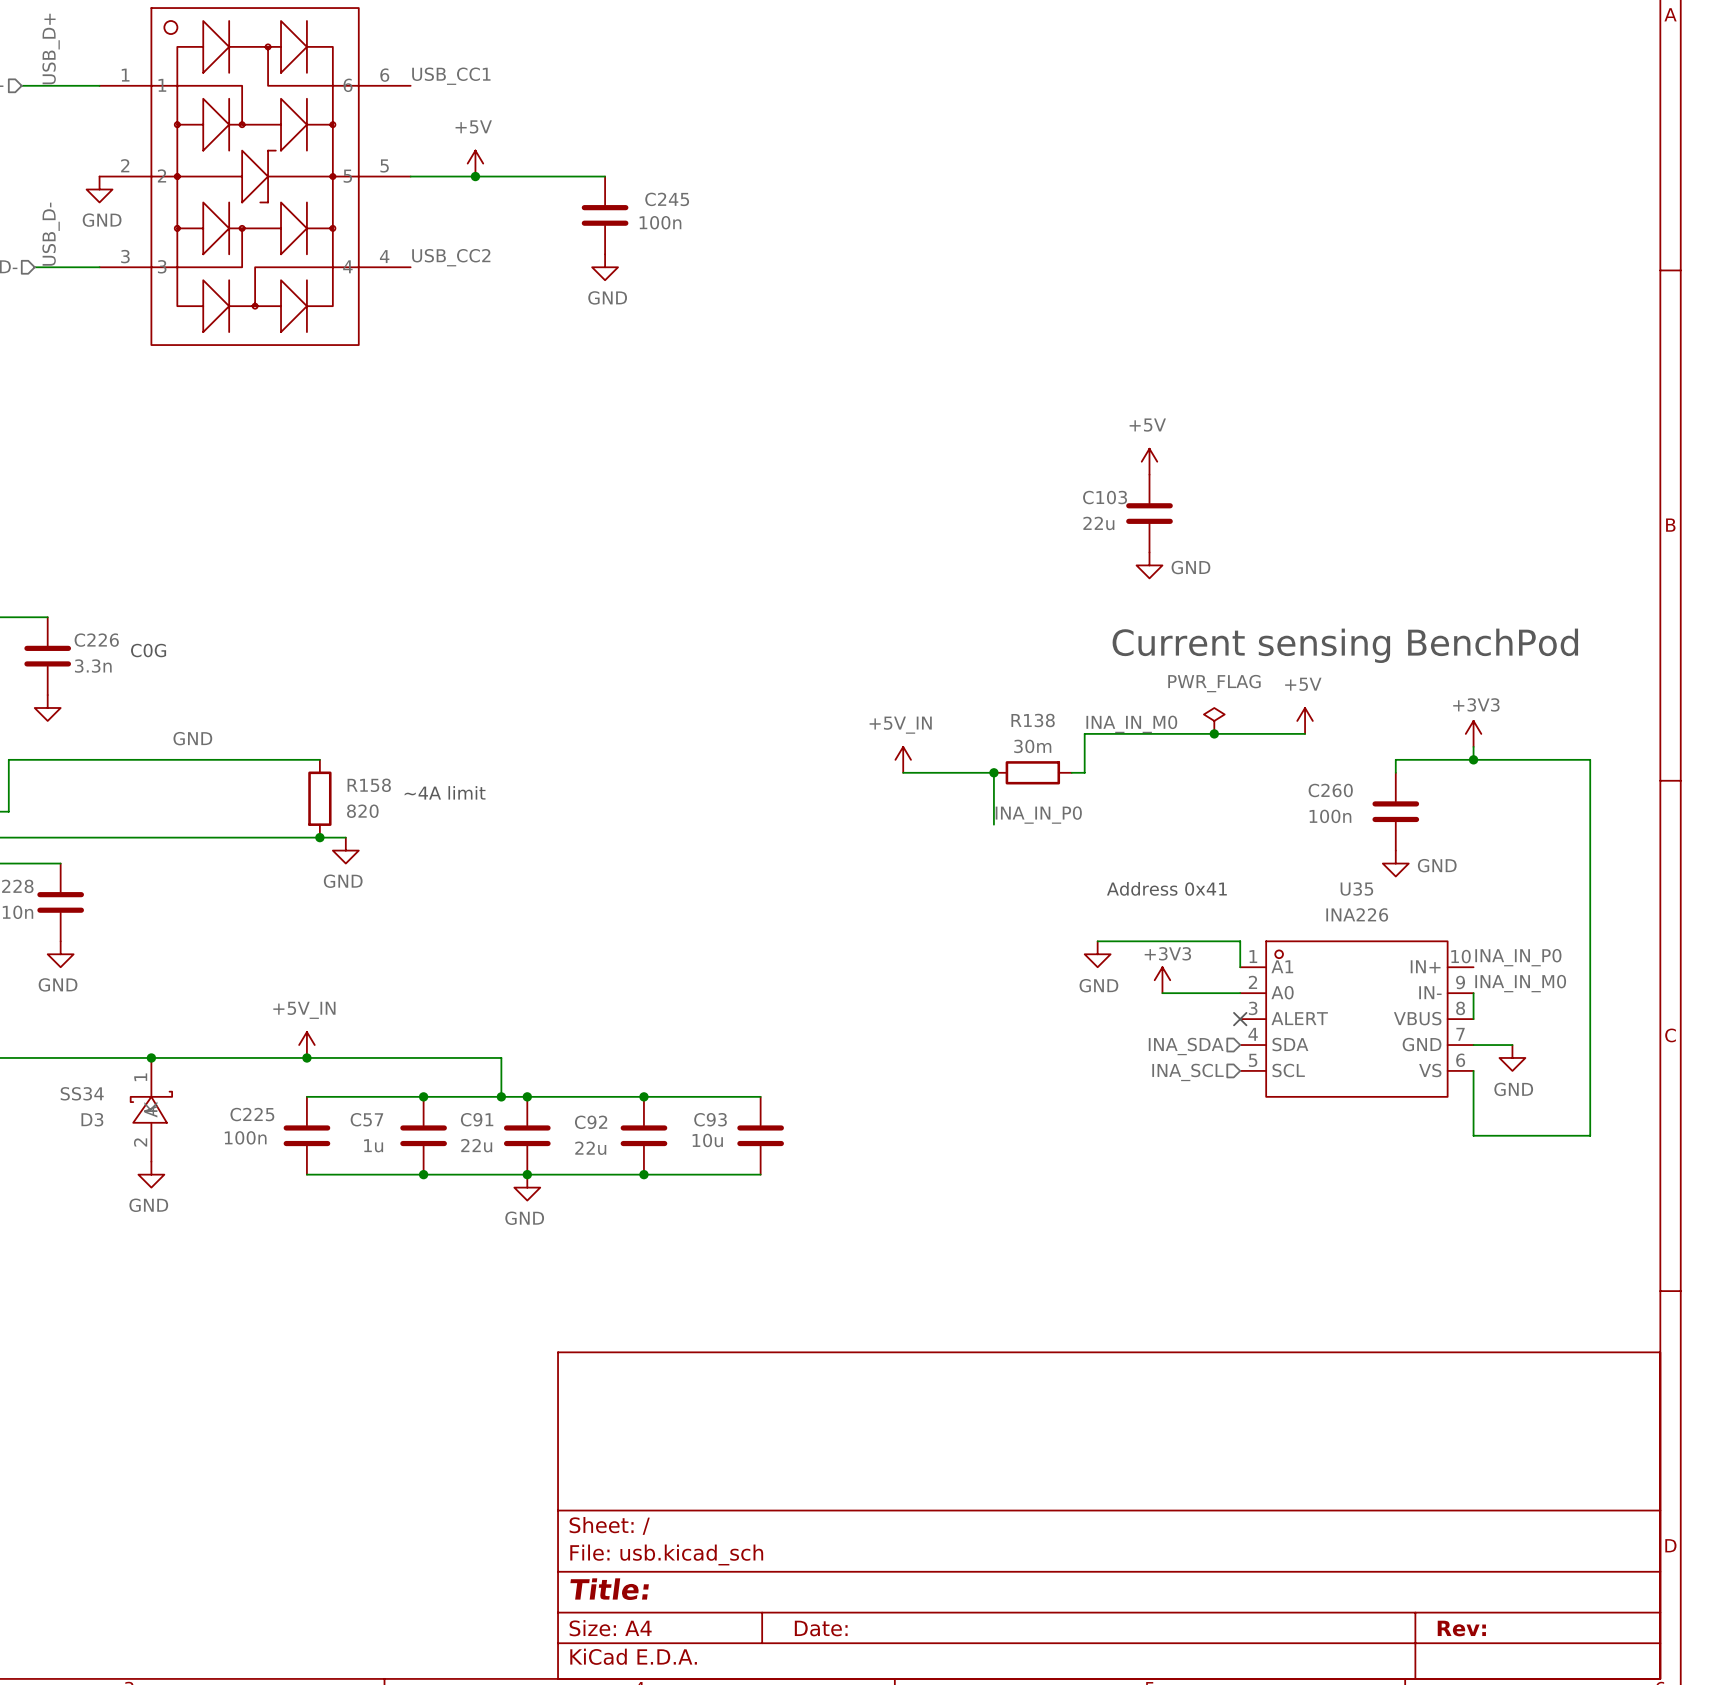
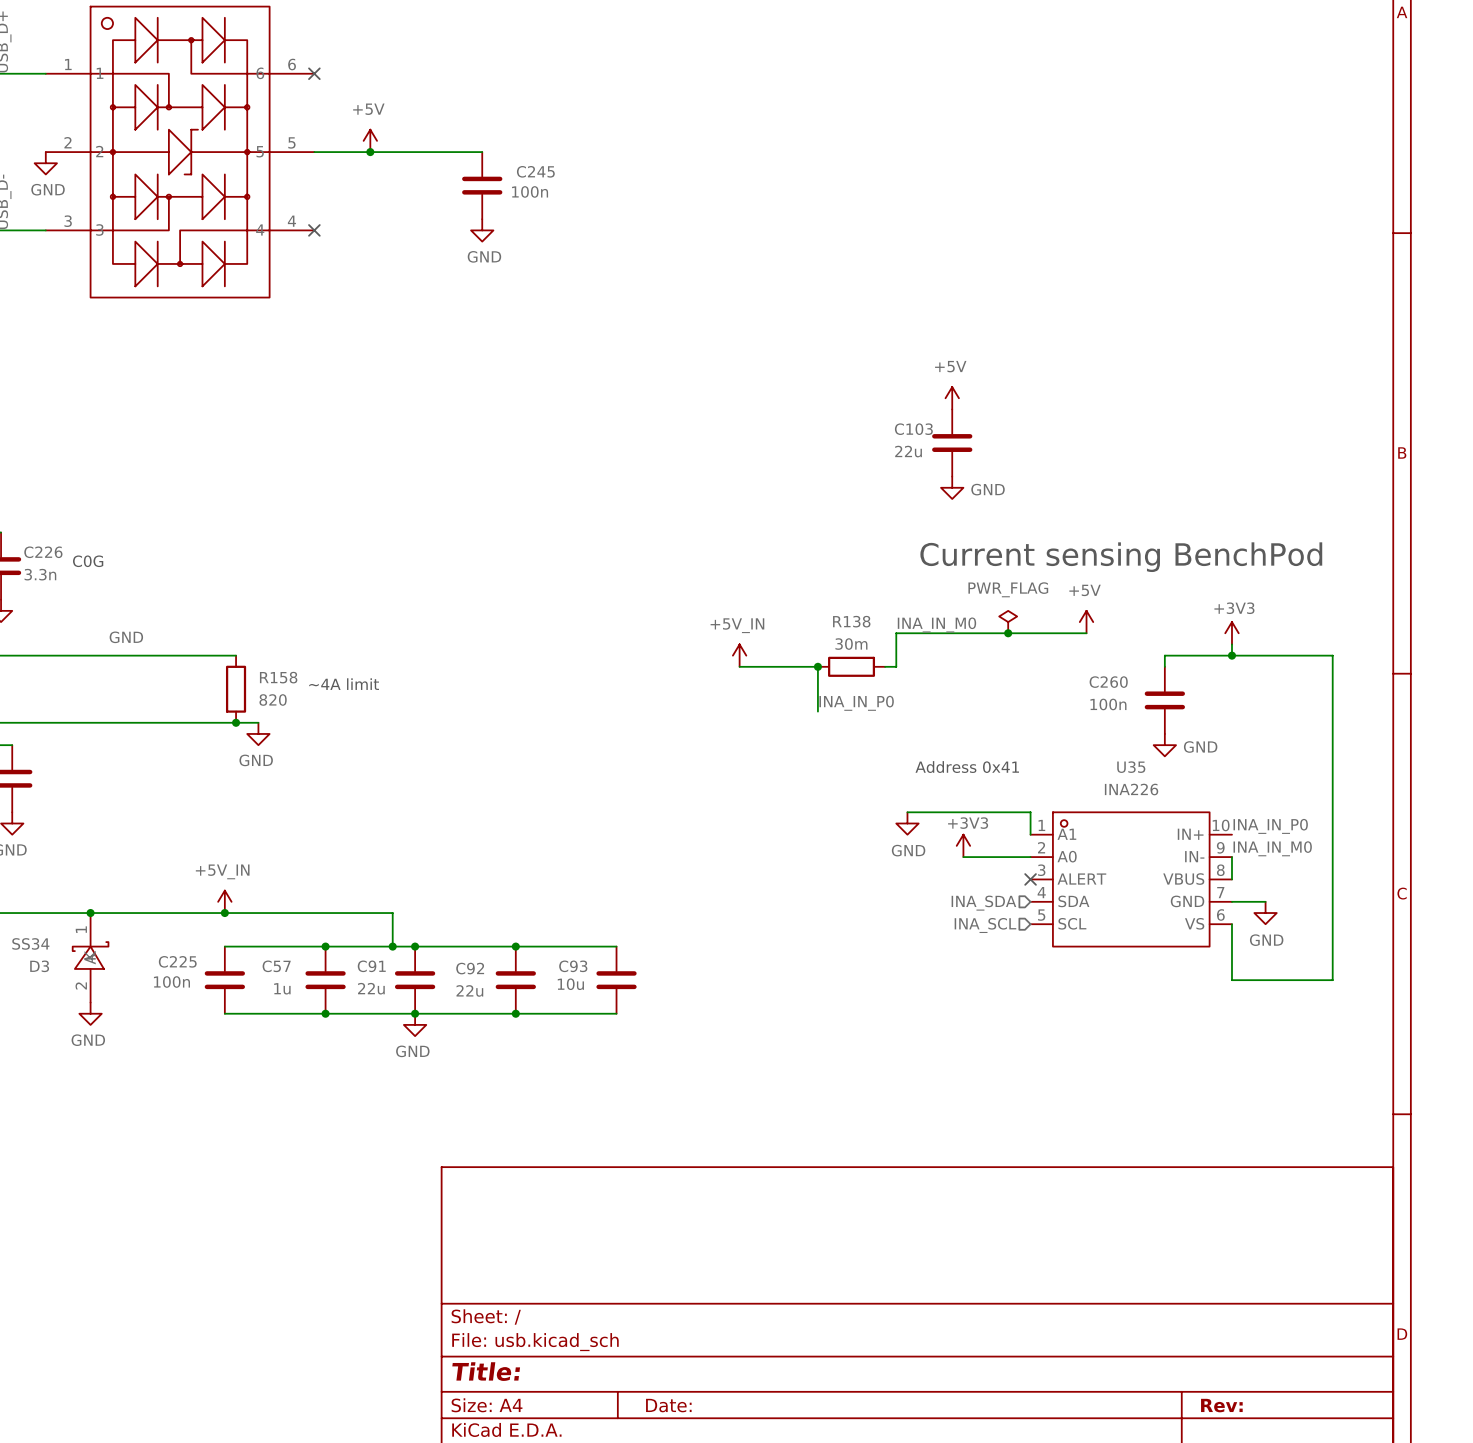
label: USB_CC1 (451, 76) -> none
no-connect mark: none -> (314, 73)
label: USB_CC2 (451, 257) -> none
no-connect mark: none -> (314, 230)

